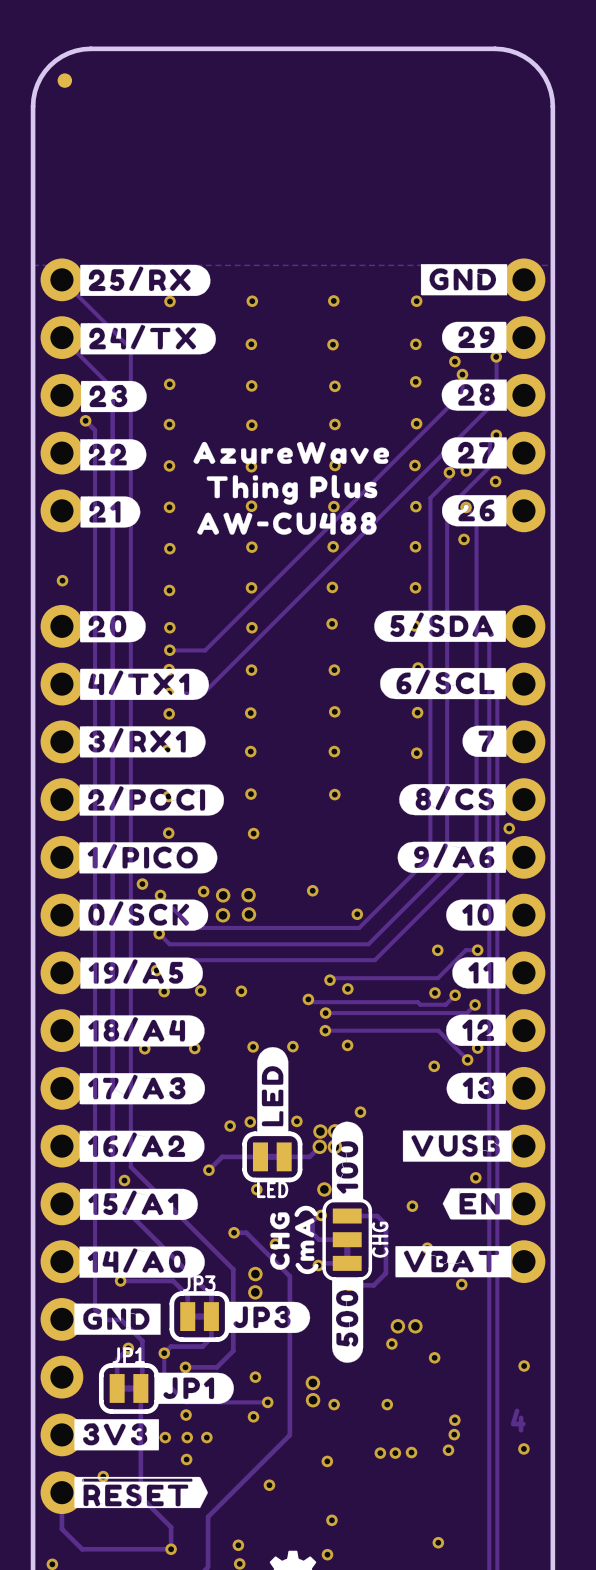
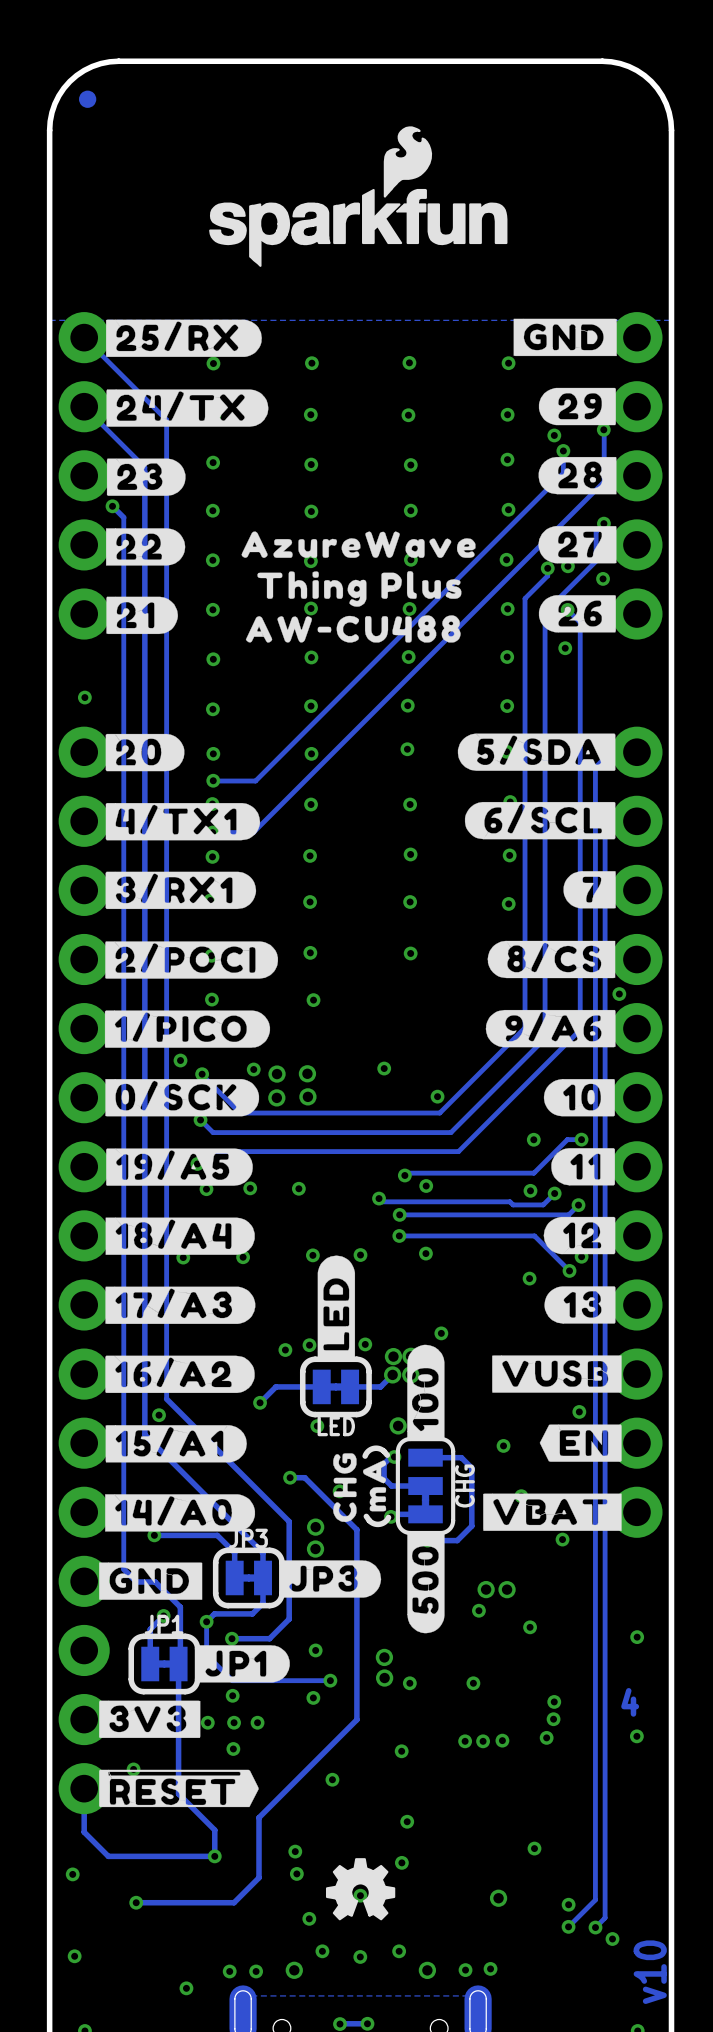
drawing: none -> [209, 126, 508, 267]

